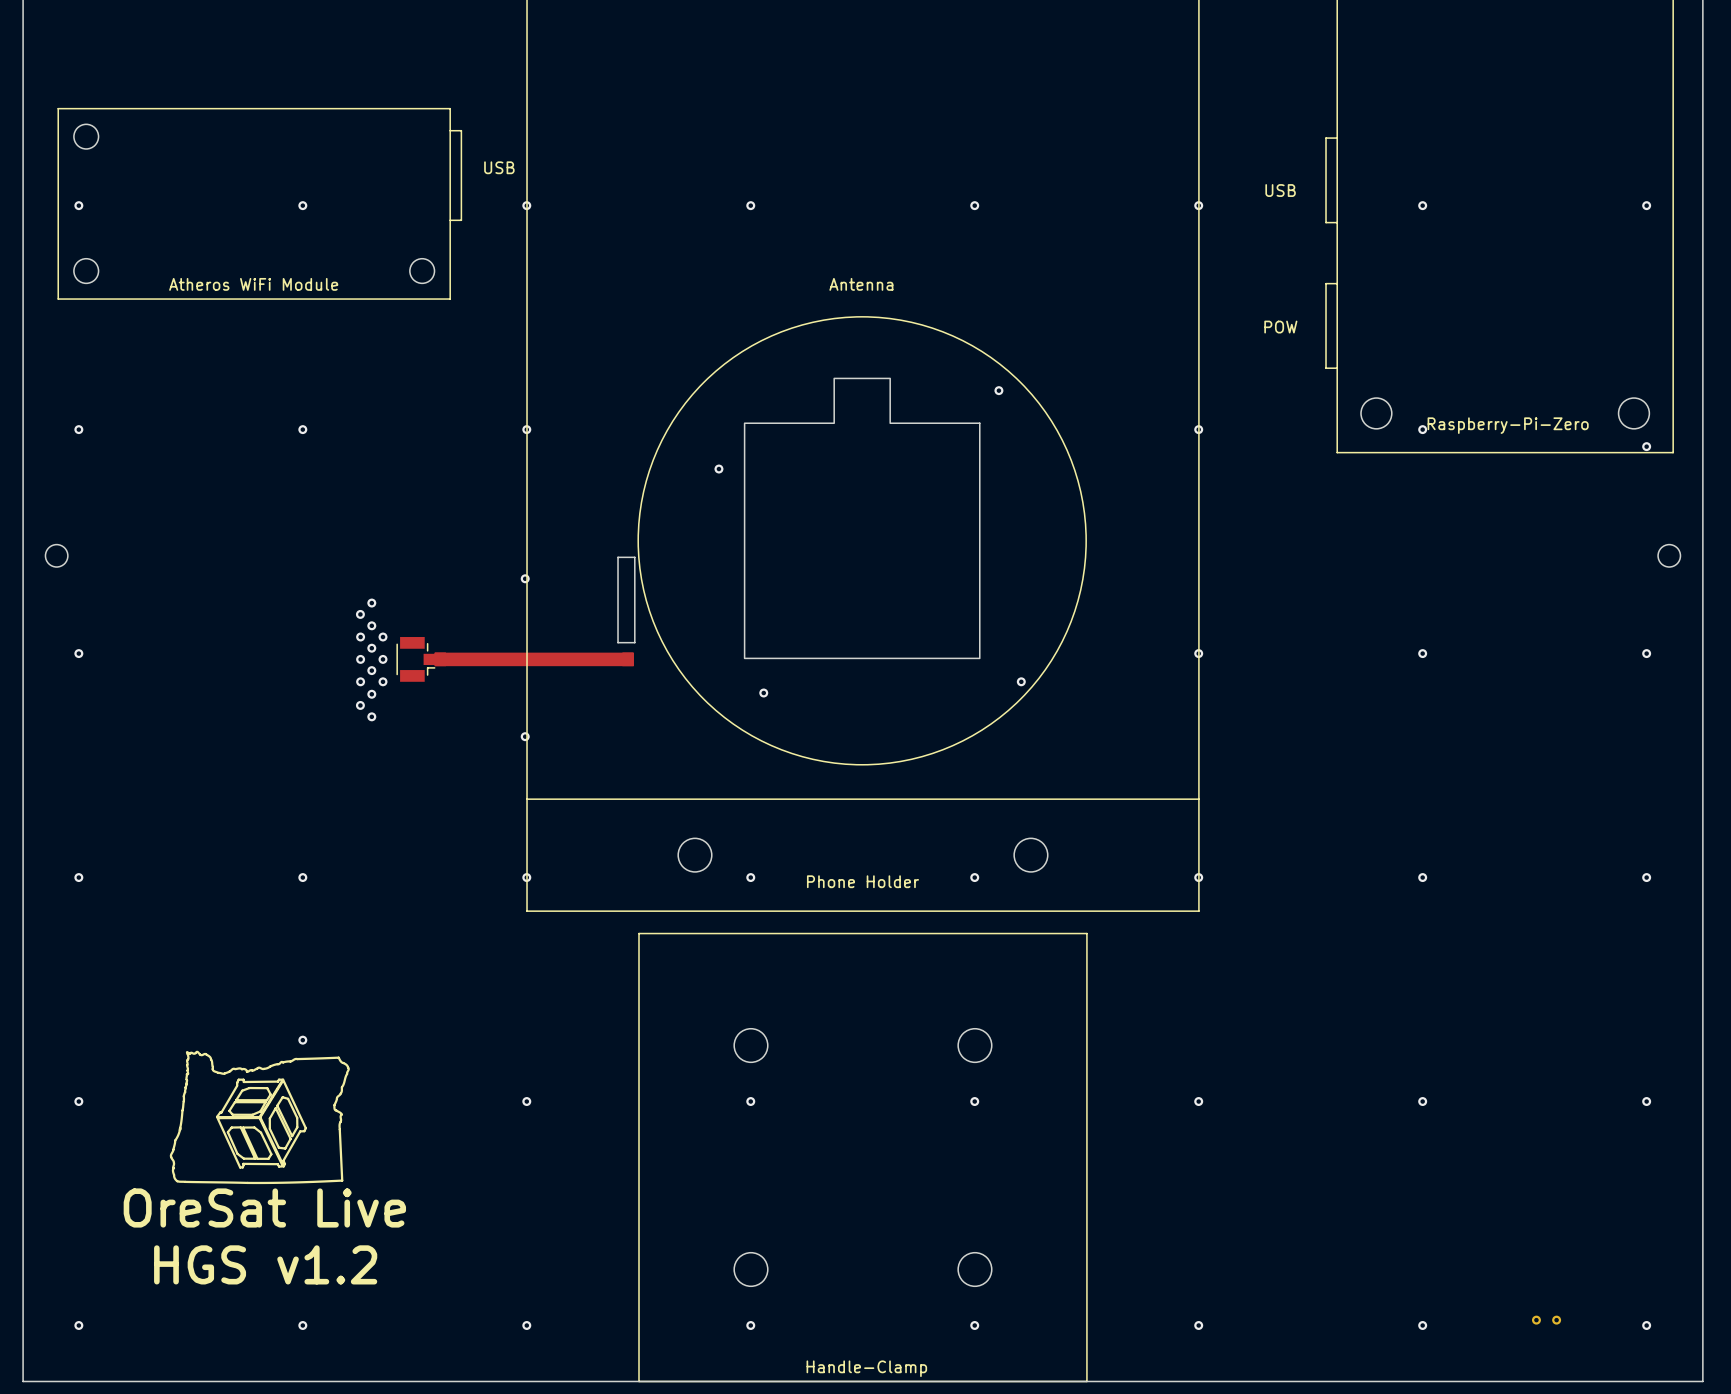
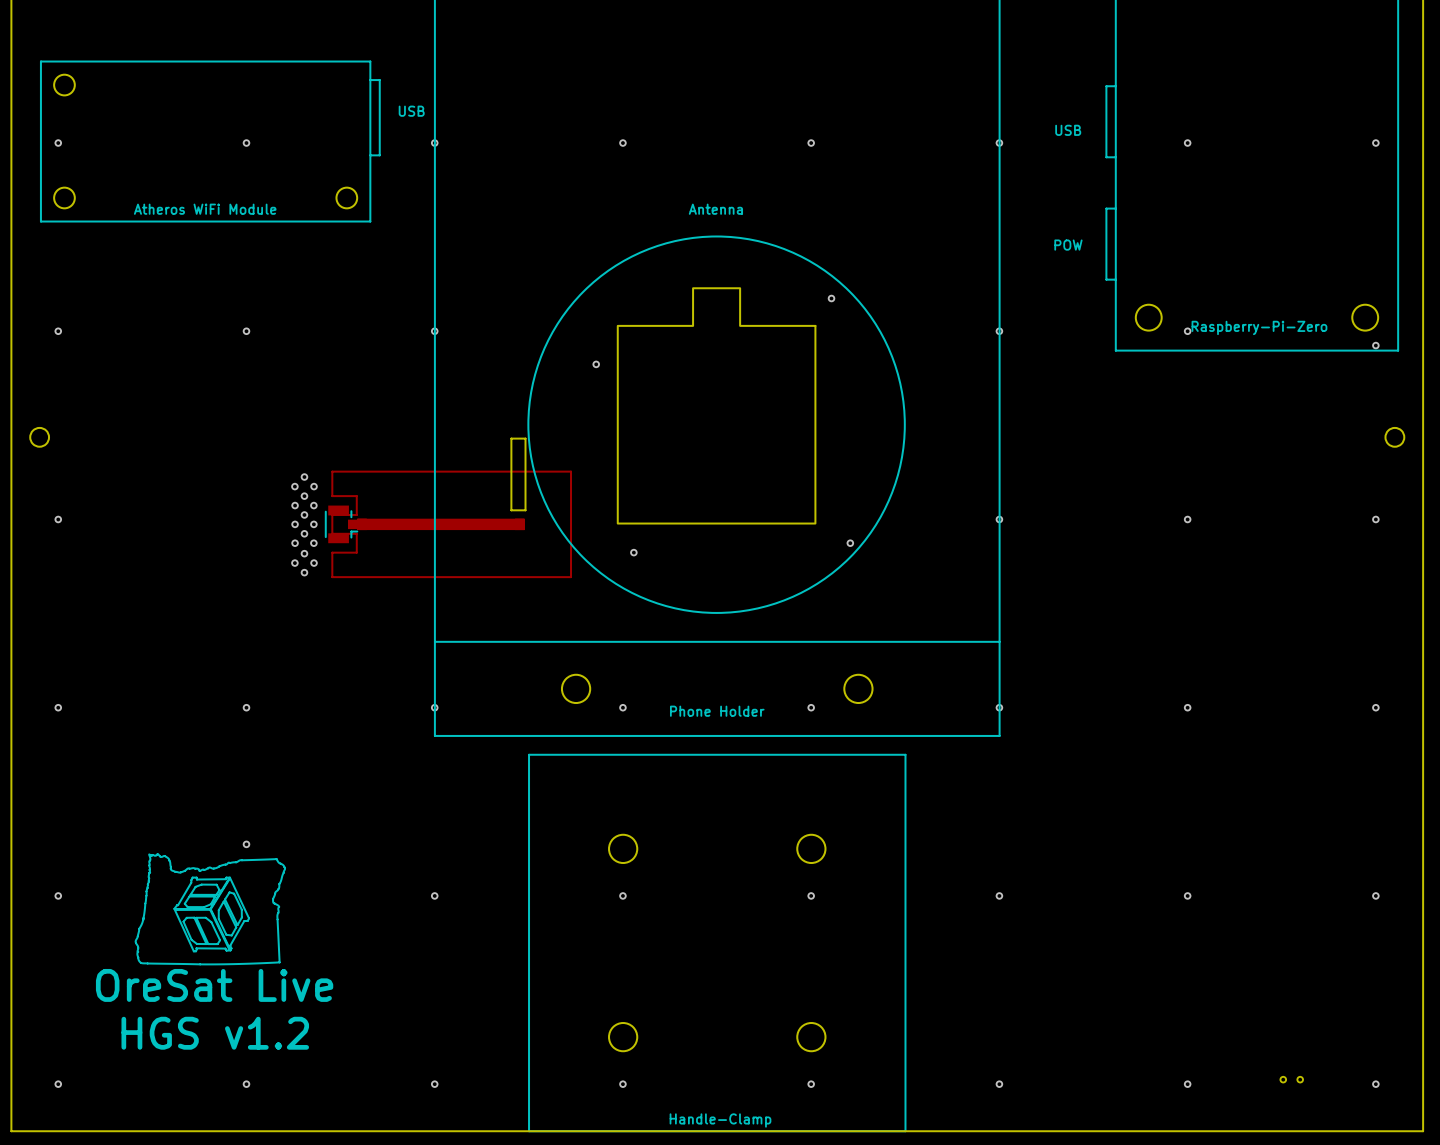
via: (525, 578) -> none
via: none -> (314, 486)
part: none -> (451, 524)
via: none -> (314, 563)
via: (525, 736) -> none

